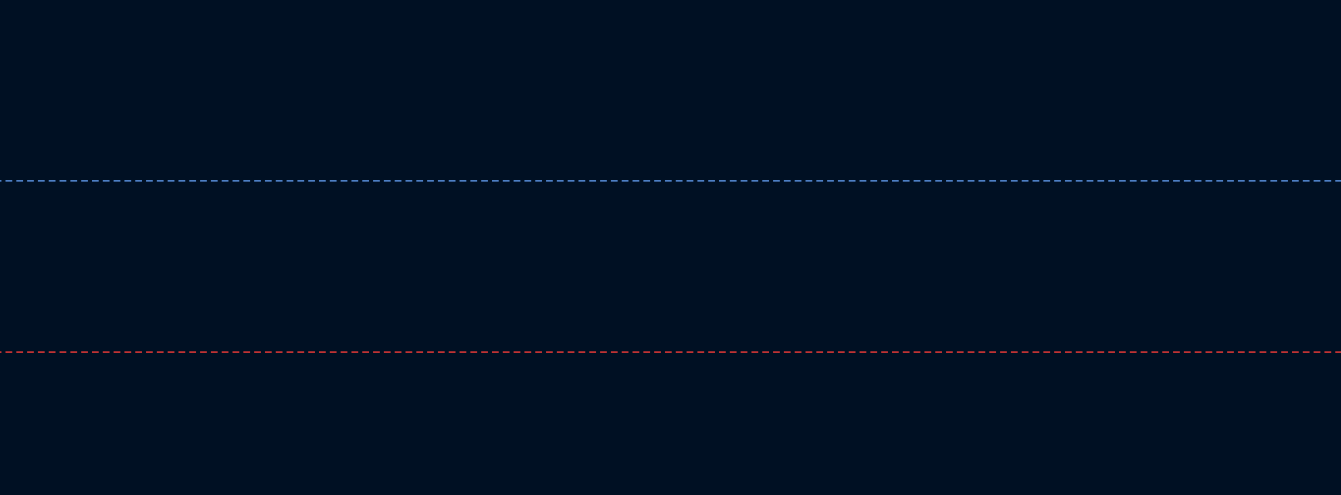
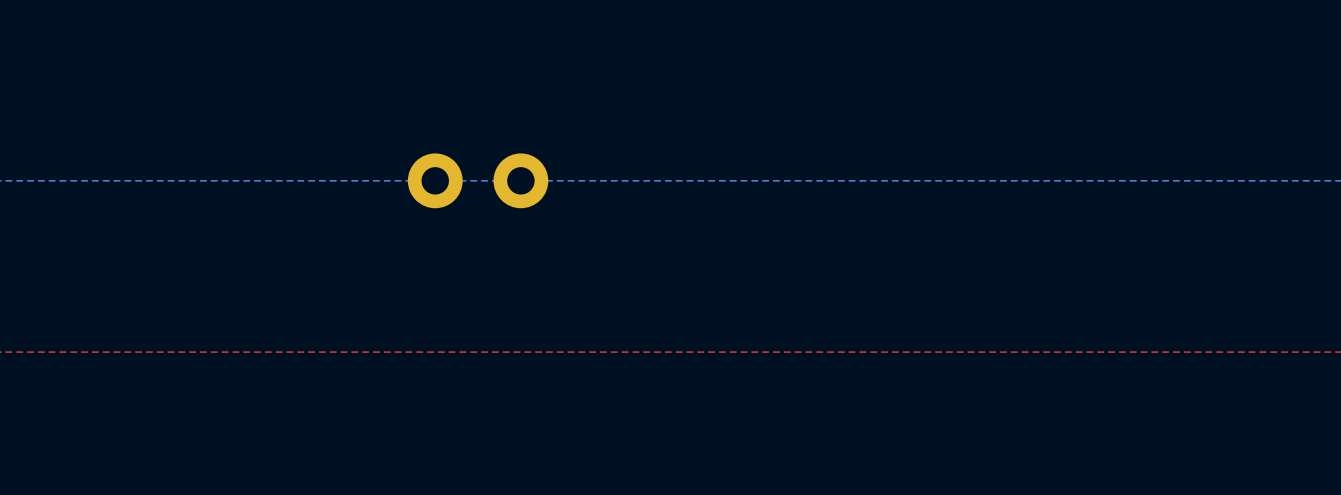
part: none -> (478, 180)

